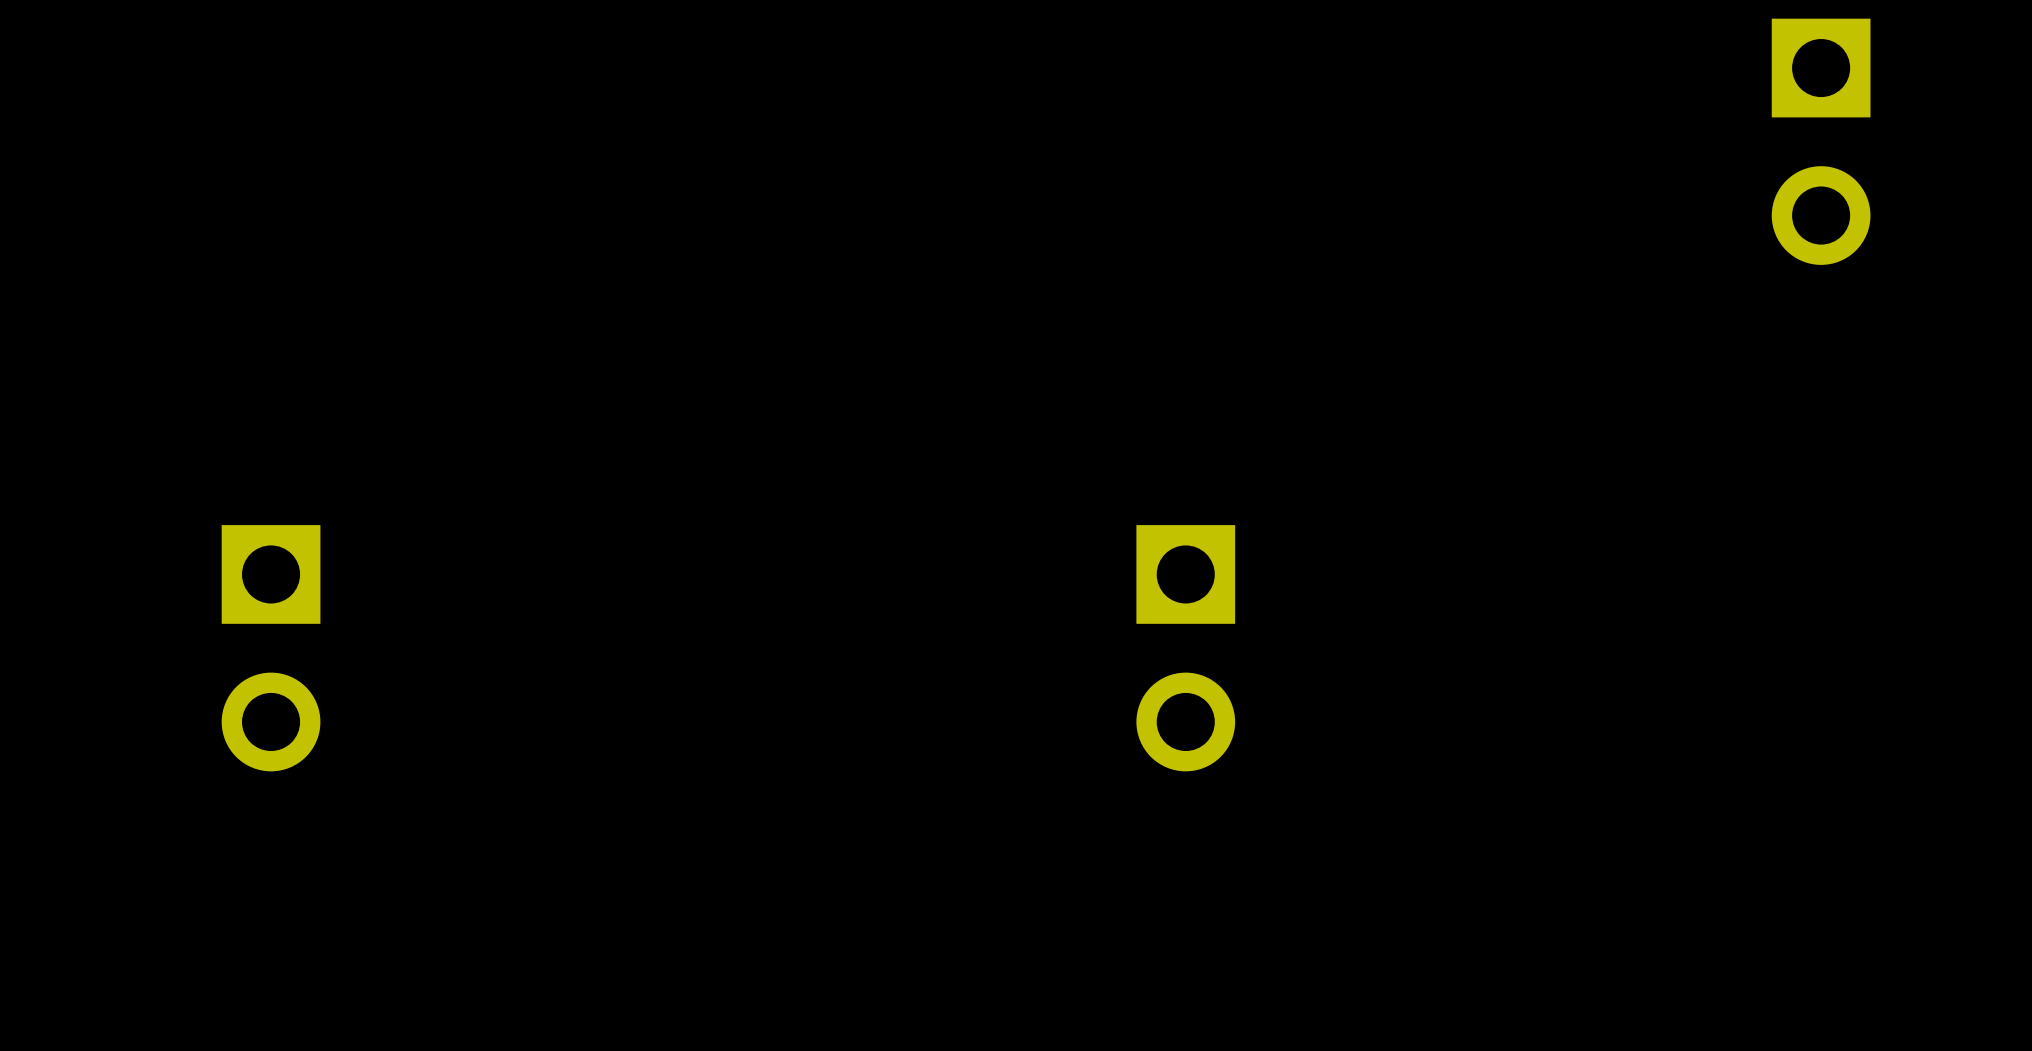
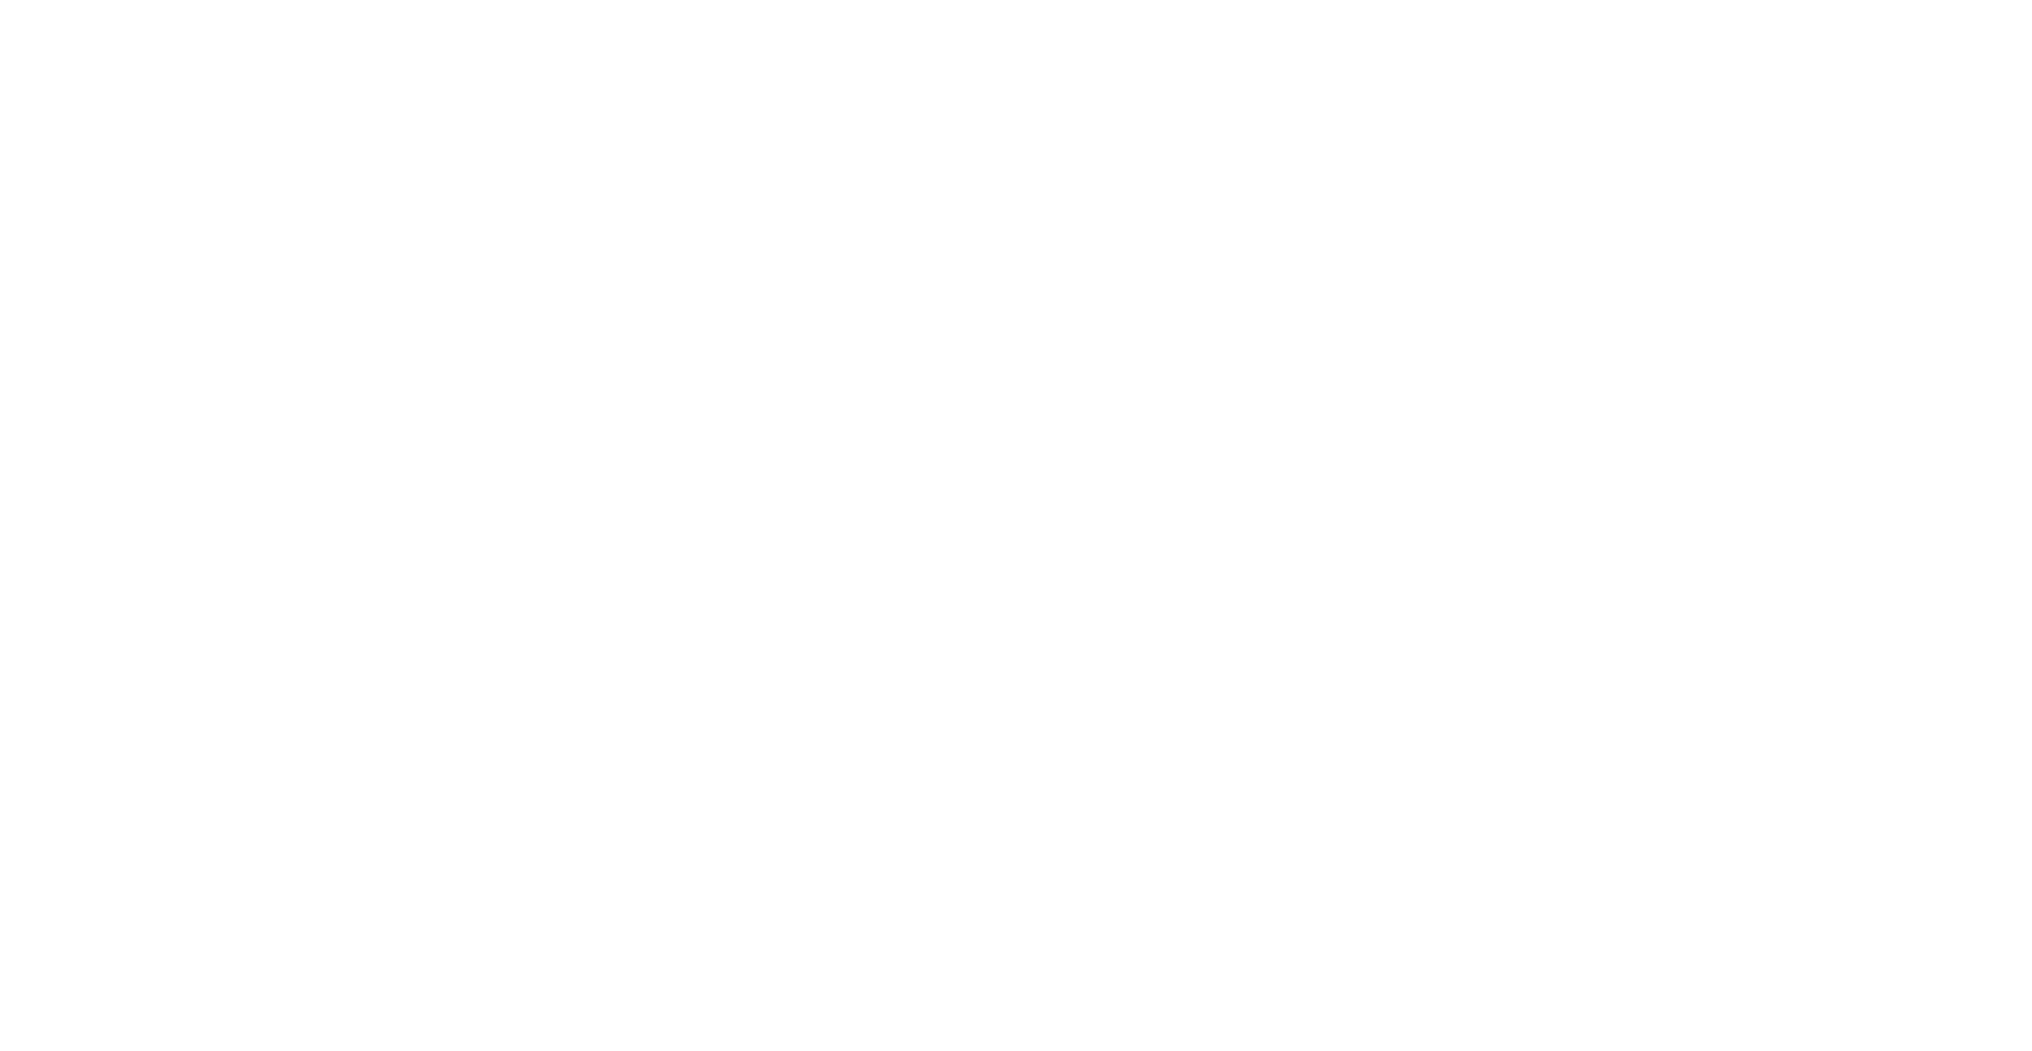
part: (1821, 141) -> none
part: (271, 648) -> none
part: (1185, 648) -> none

